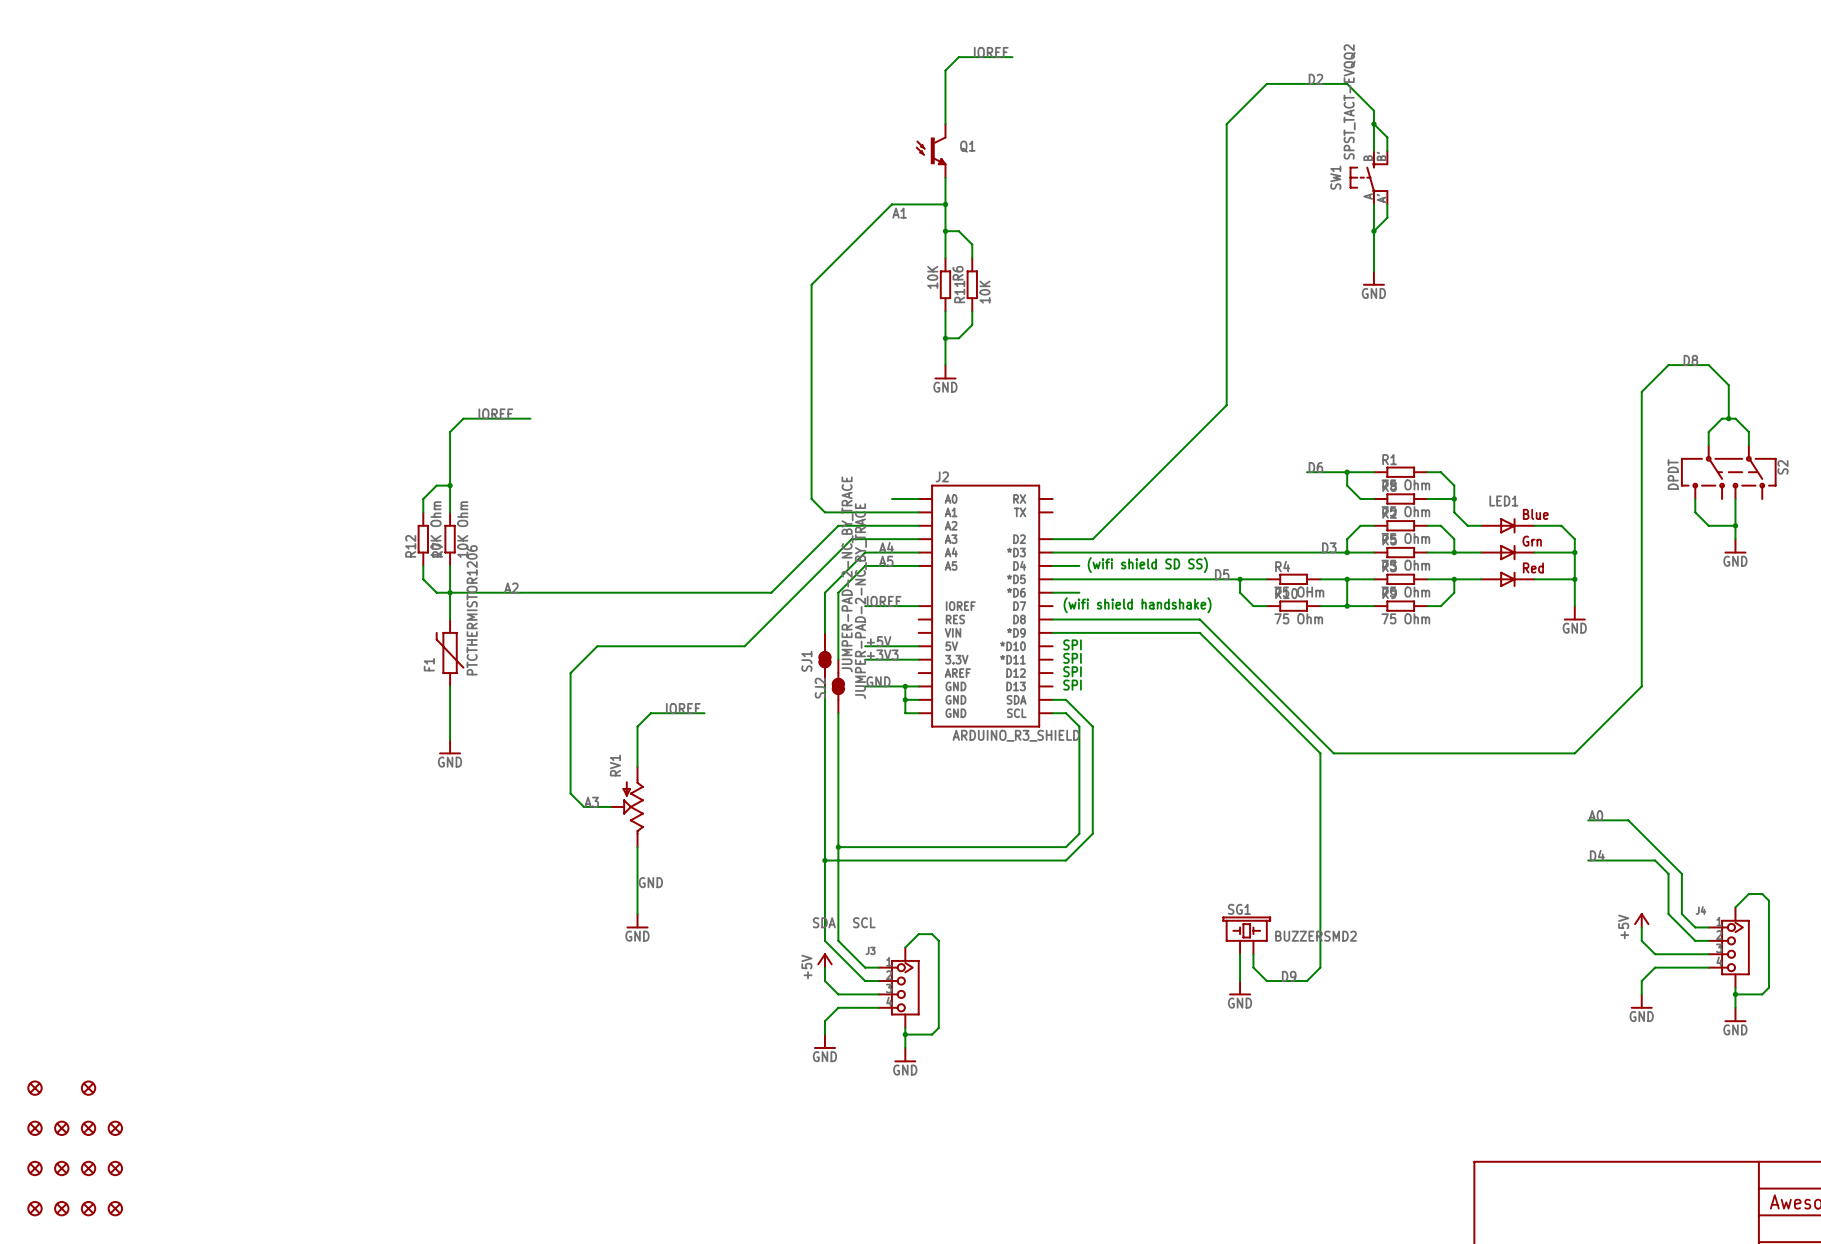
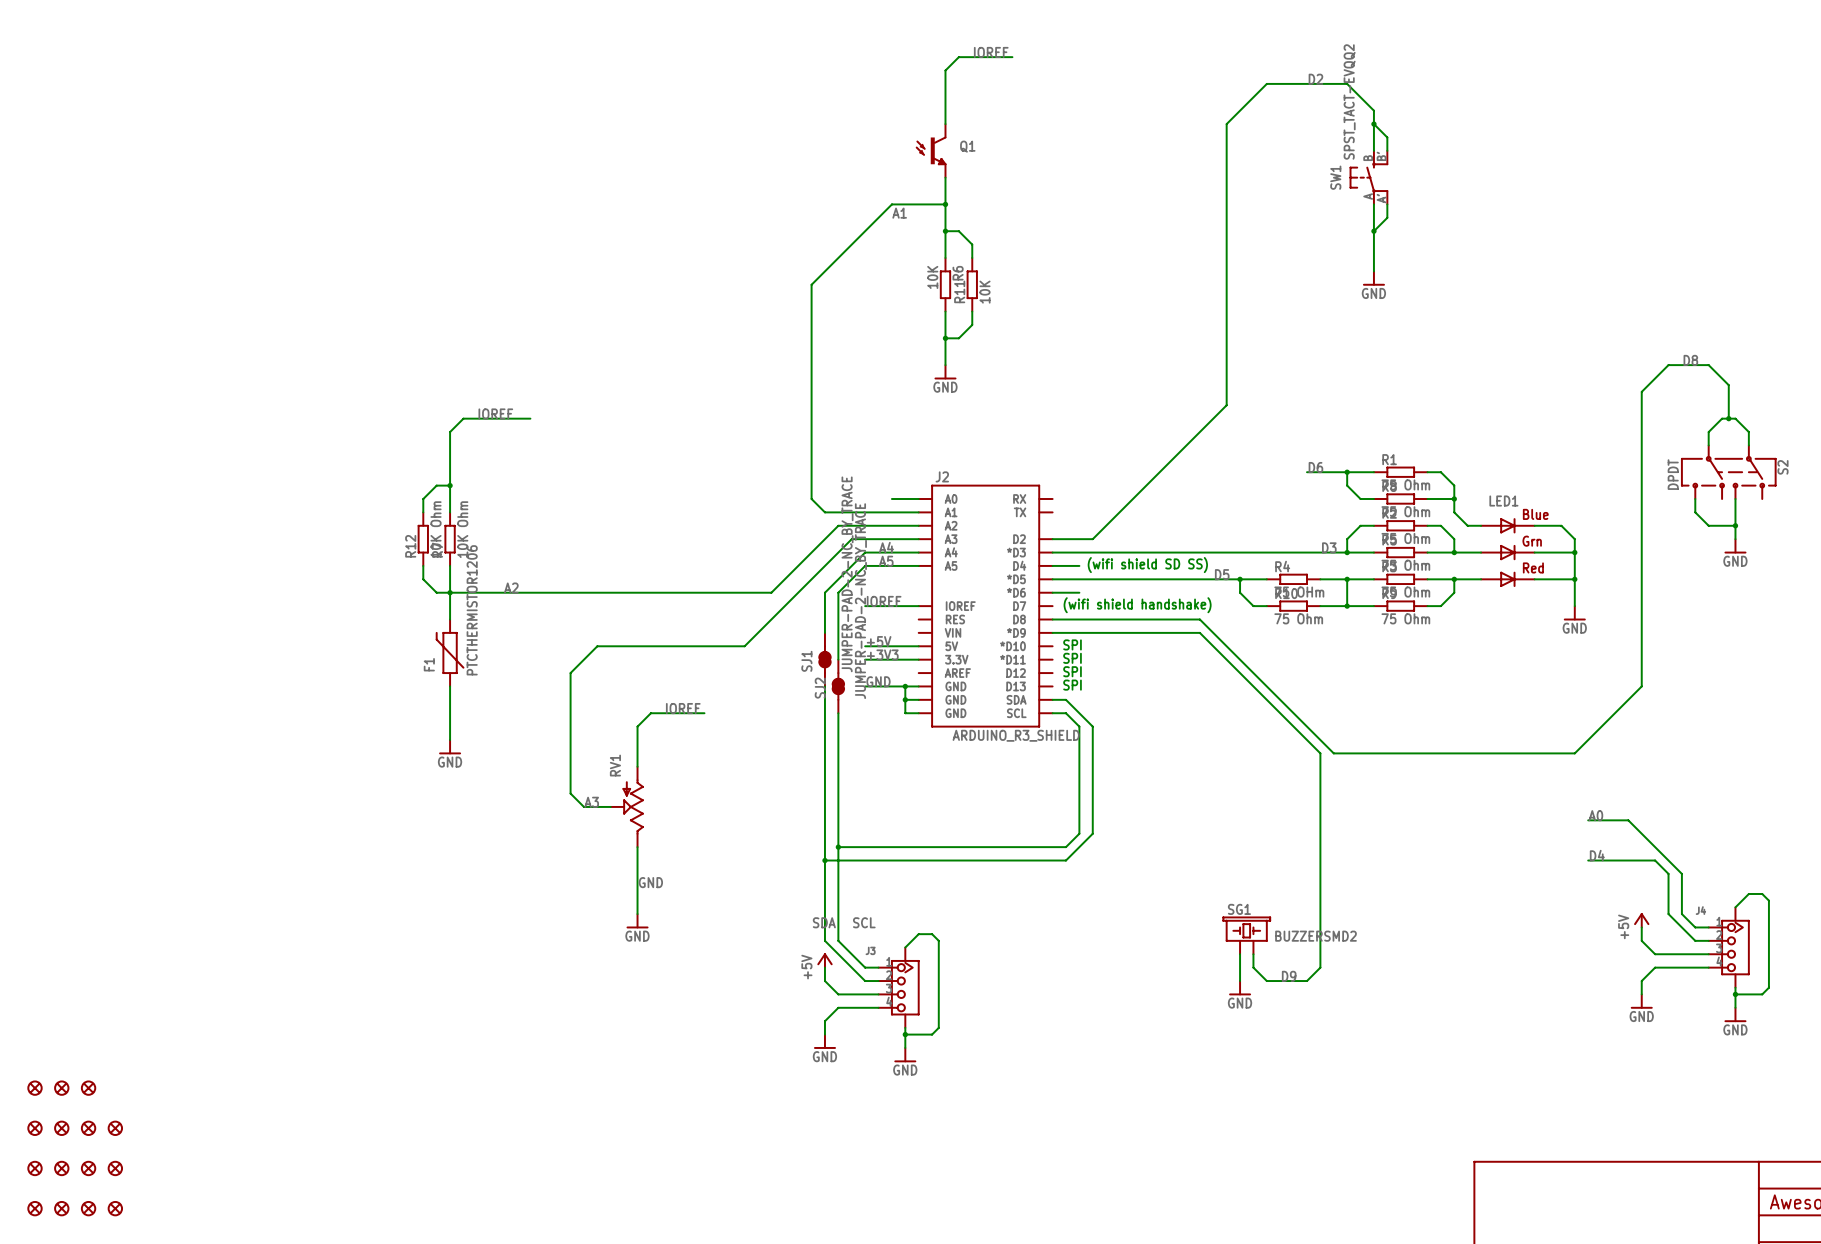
part: none -> (61, 1088)

